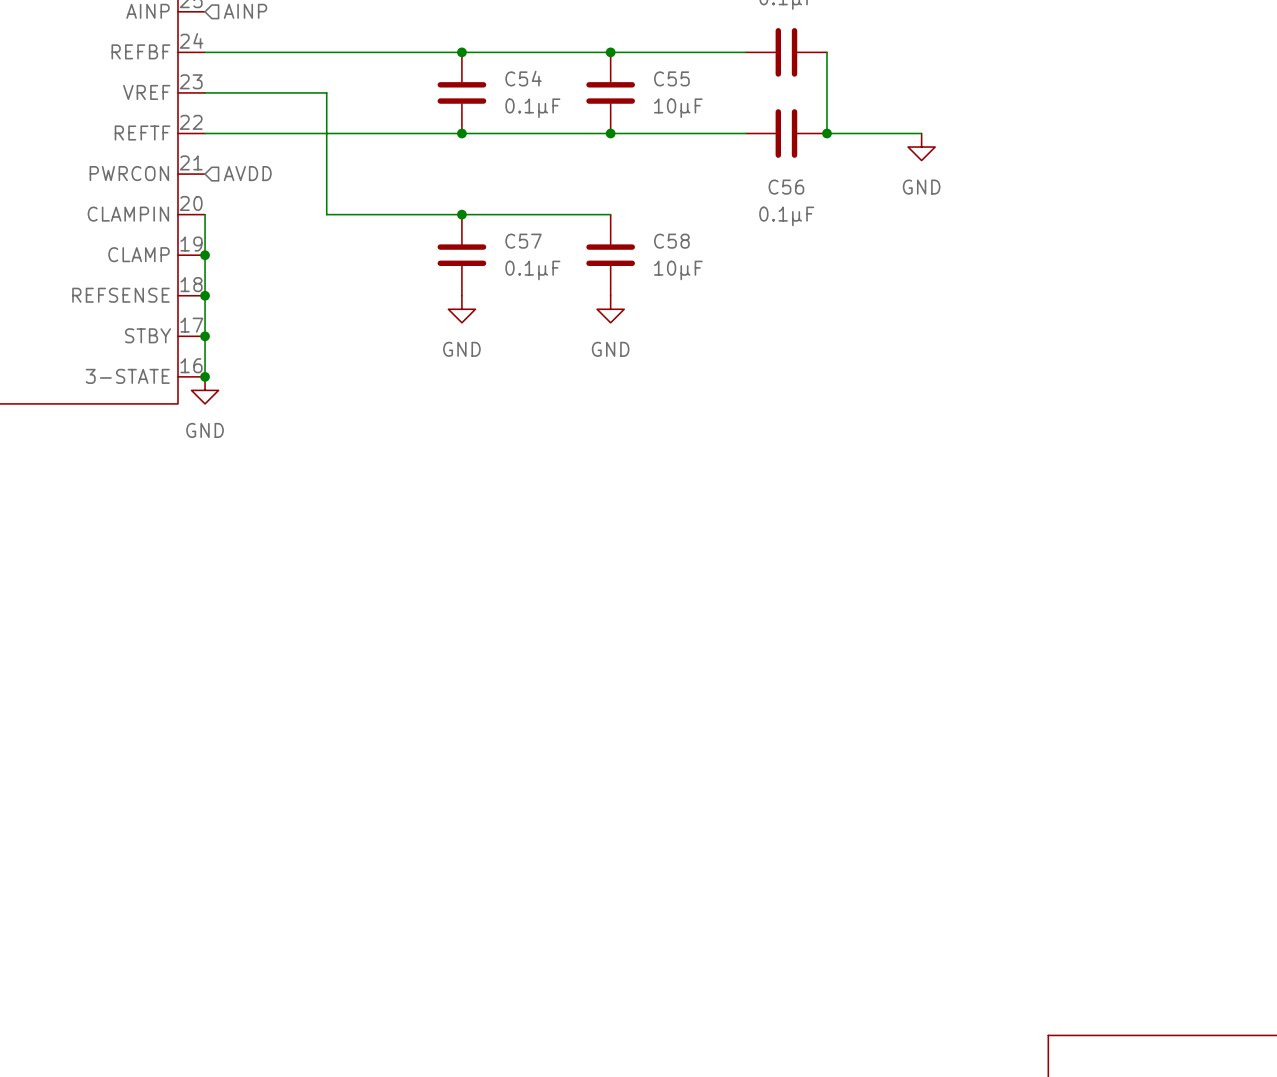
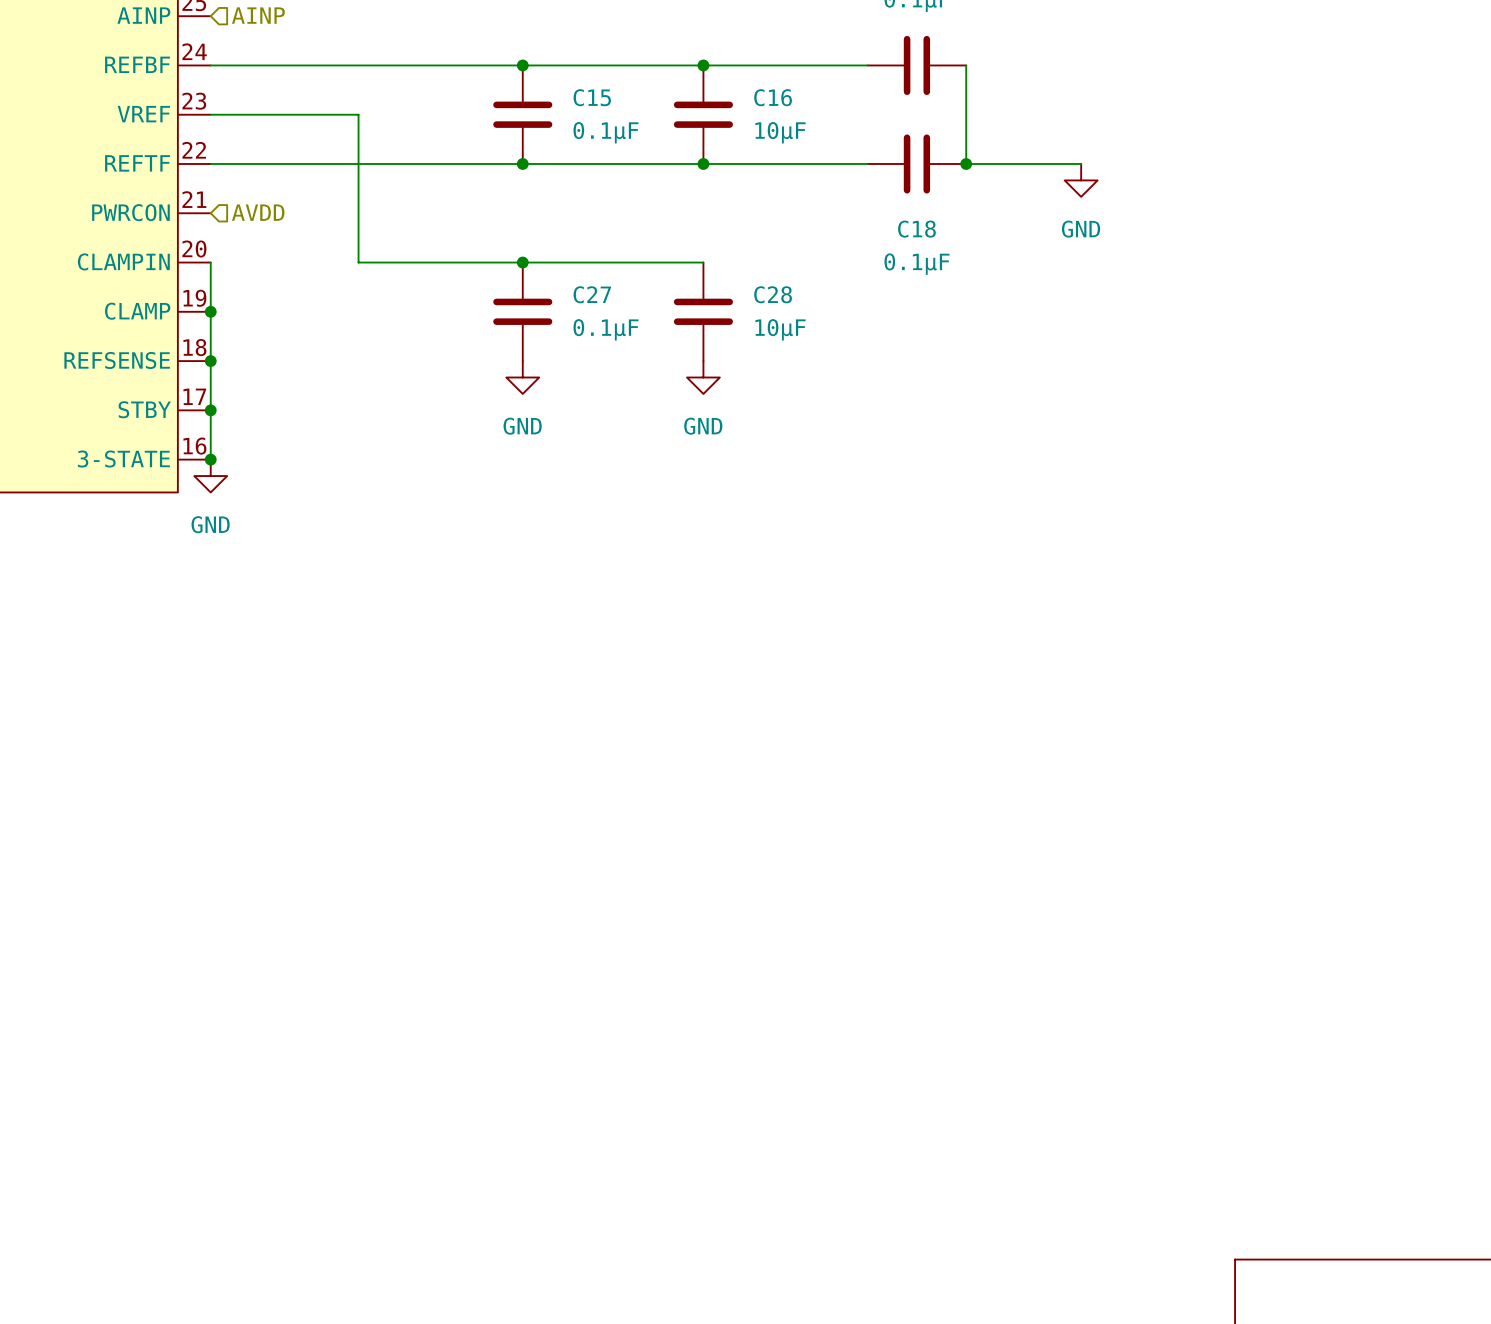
C54 name: C54 (523, 78) -> C15 (592, 97)
C55 name: C55 (671, 78) -> C16 (773, 97)
C56 name: C56 (786, 187) -> C18 (916, 229)
C57 name: C57 (523, 241) -> C27 (592, 294)
C58 name: C58 (671, 241) -> C28 (773, 294)

